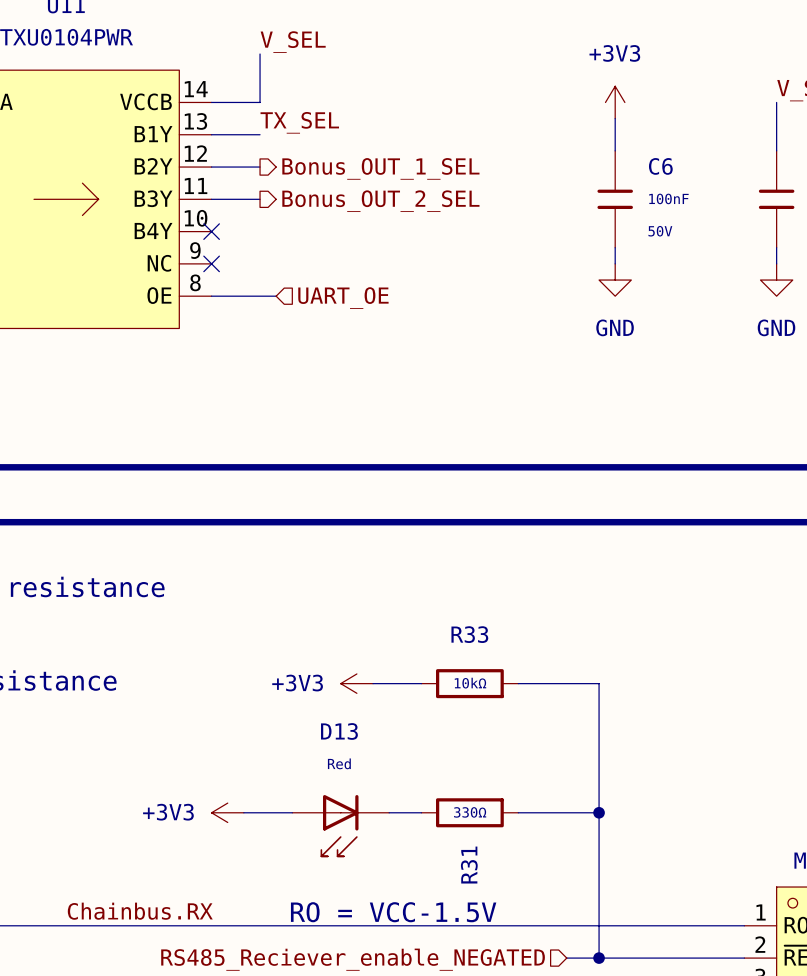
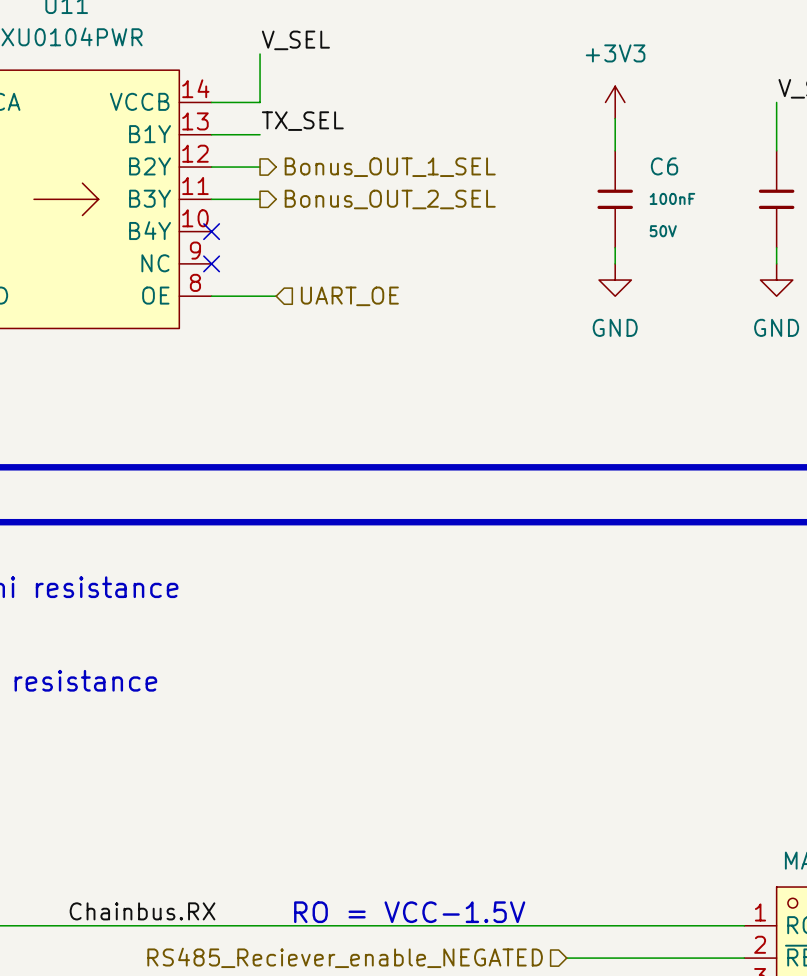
power symbol: +3V3 (356, 683) -> none
wire: (373, 683) (421, 683) -> none
R33: 10kΩ (469, 683) -> none
wire: (518, 683) (599, 683) (599, 958) -> none
power symbol: +3V3 (227, 812) -> none
wire: (243, 812) (292, 812) -> none
wire: (389, 812) (421, 812) -> none
R31: 330Ω (469, 812) -> none
wire: (518, 812) (599, 812) -> none
junction: (599, 812) -> none
D13: Red (340, 826) -> none
junction: (599, 958) -> none

